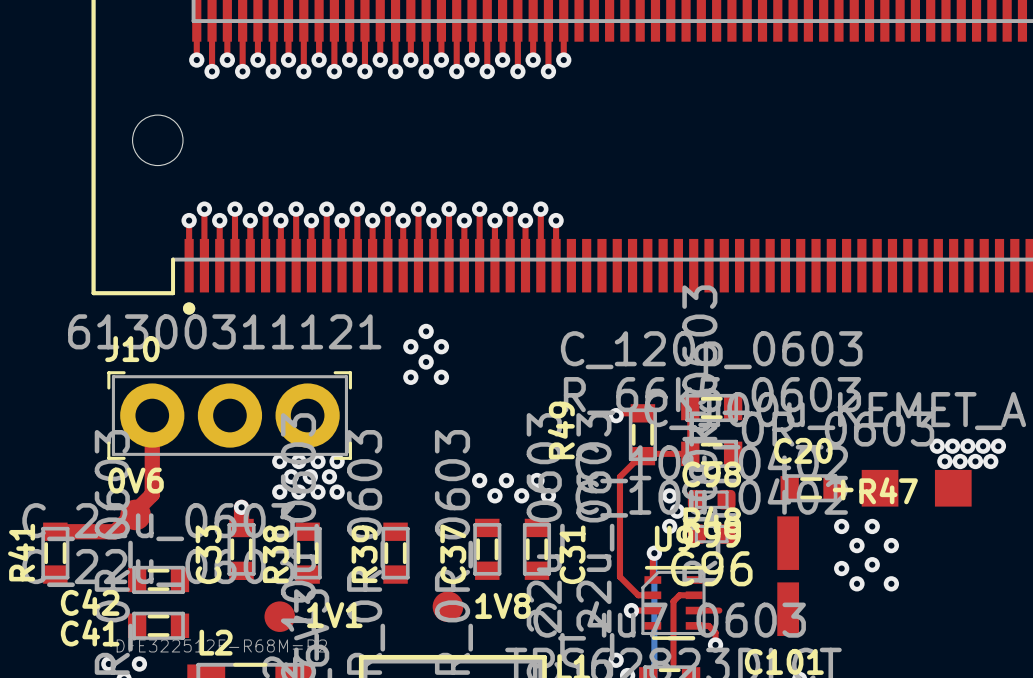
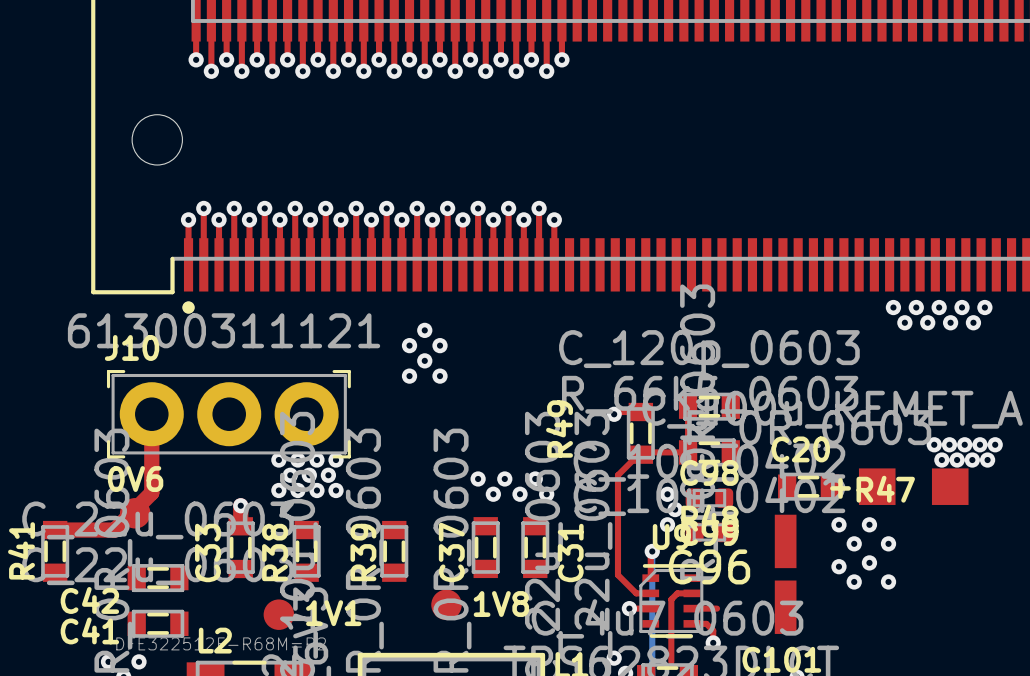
via: none -> (893, 307)
via: none -> (916, 307)
via: none -> (939, 307)
via: none -> (962, 307)
via: none -> (984, 307)
via: none -> (904, 322)
via: none -> (927, 322)
via: none -> (950, 322)
via: none -> (973, 322)

